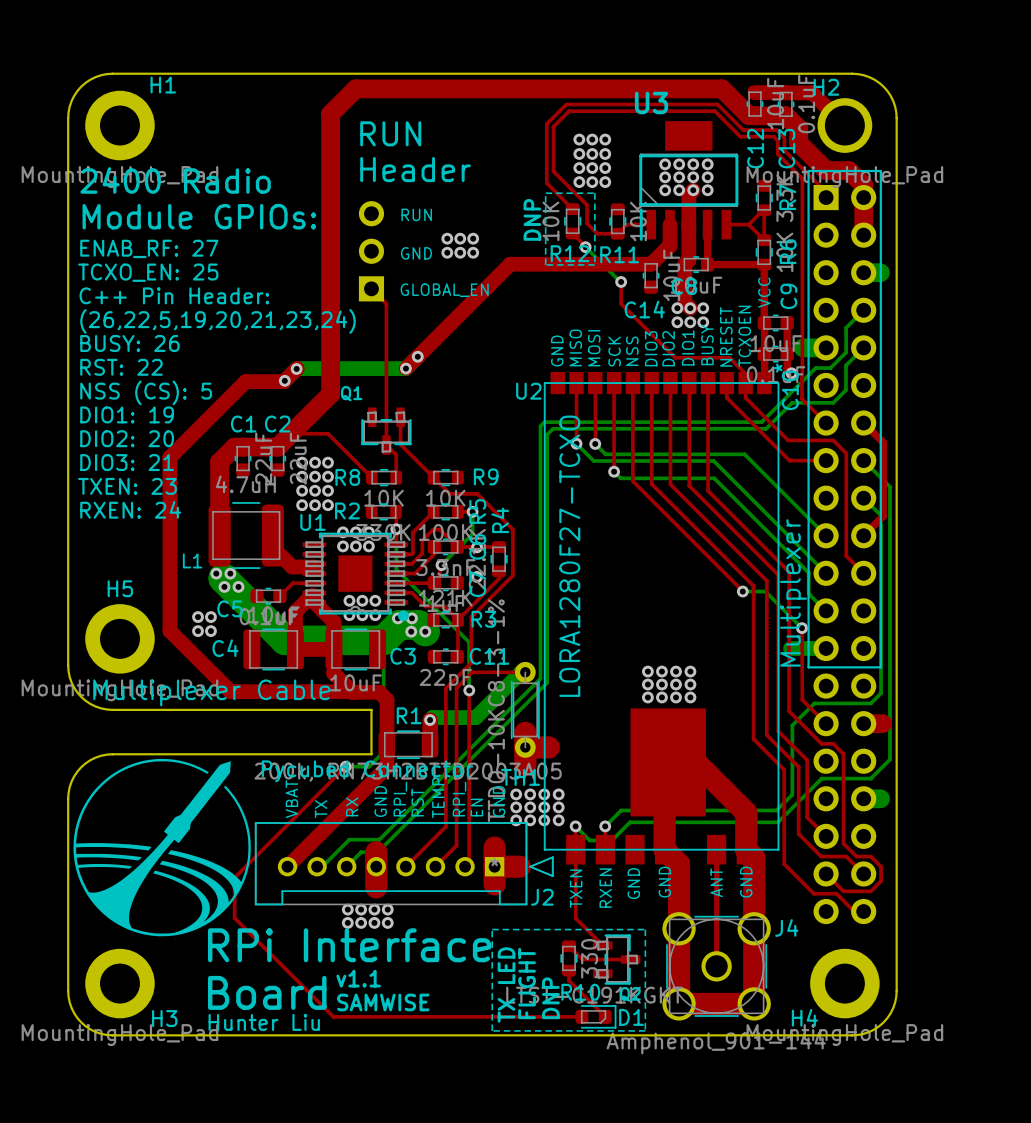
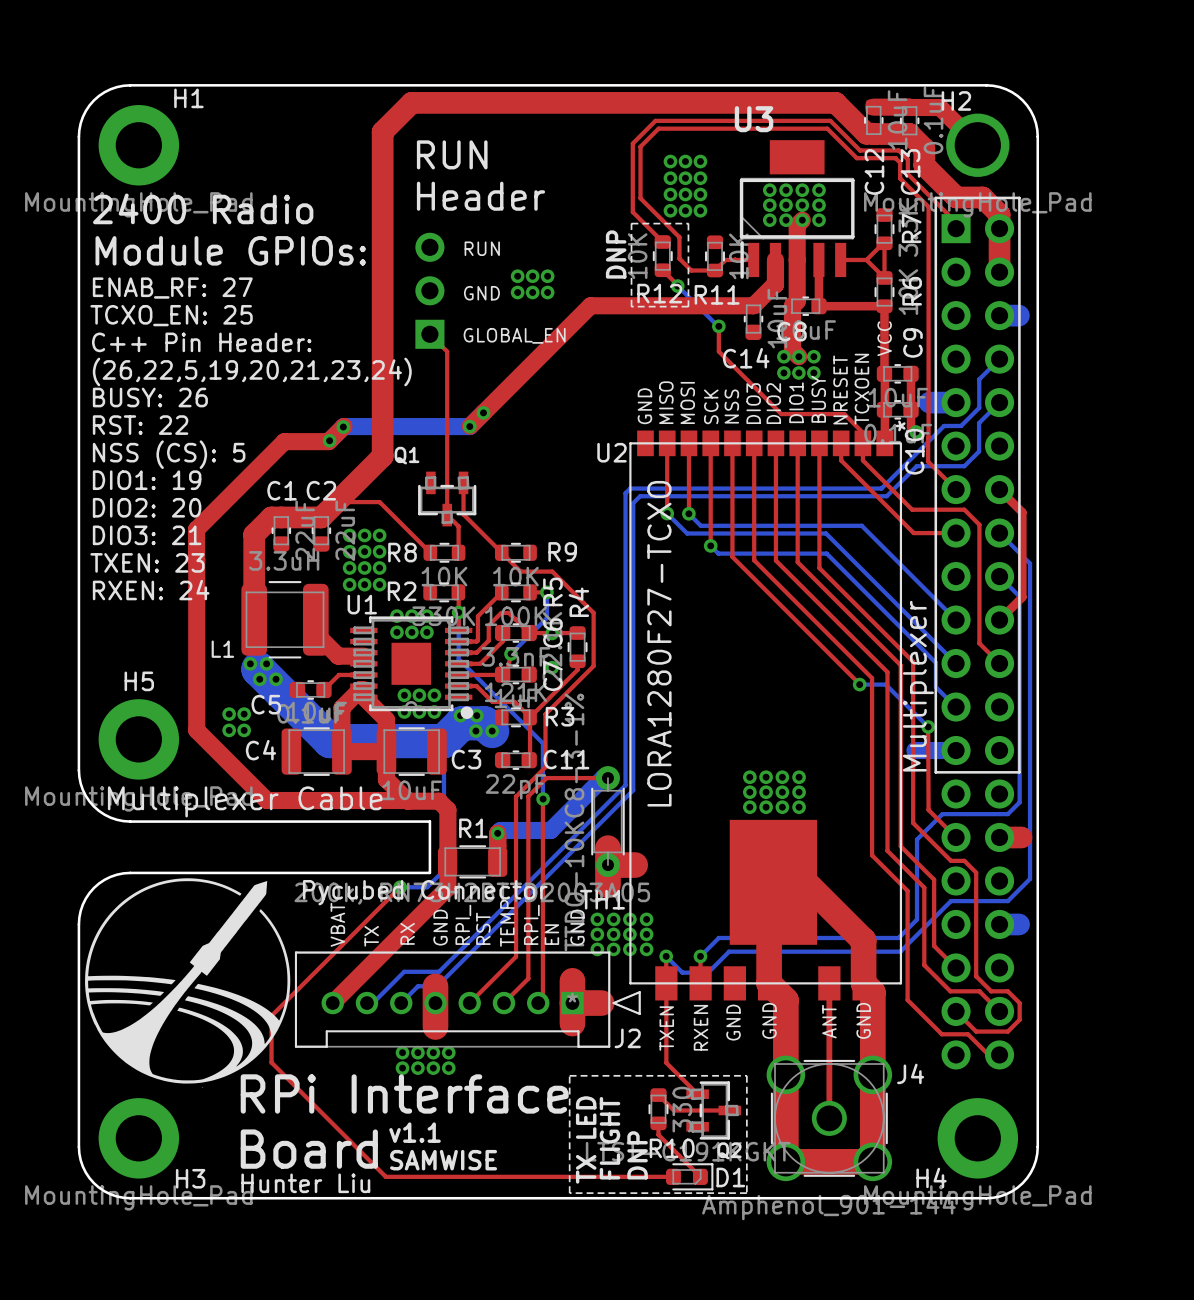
L1 value: 4.7uH (245, 484) -> 3.3uH (284, 560)

